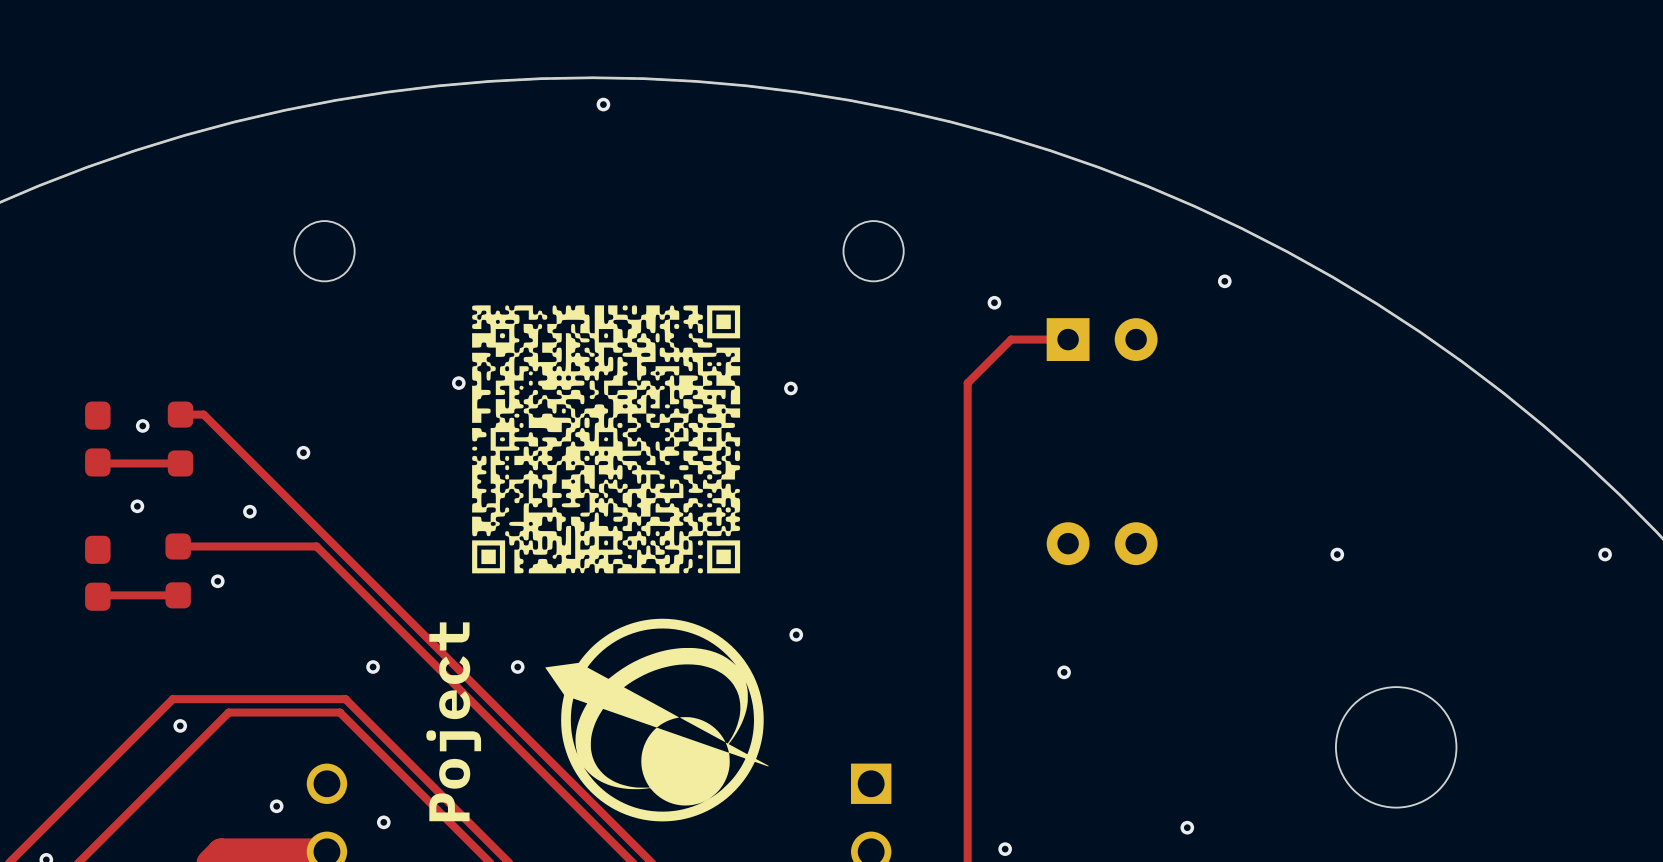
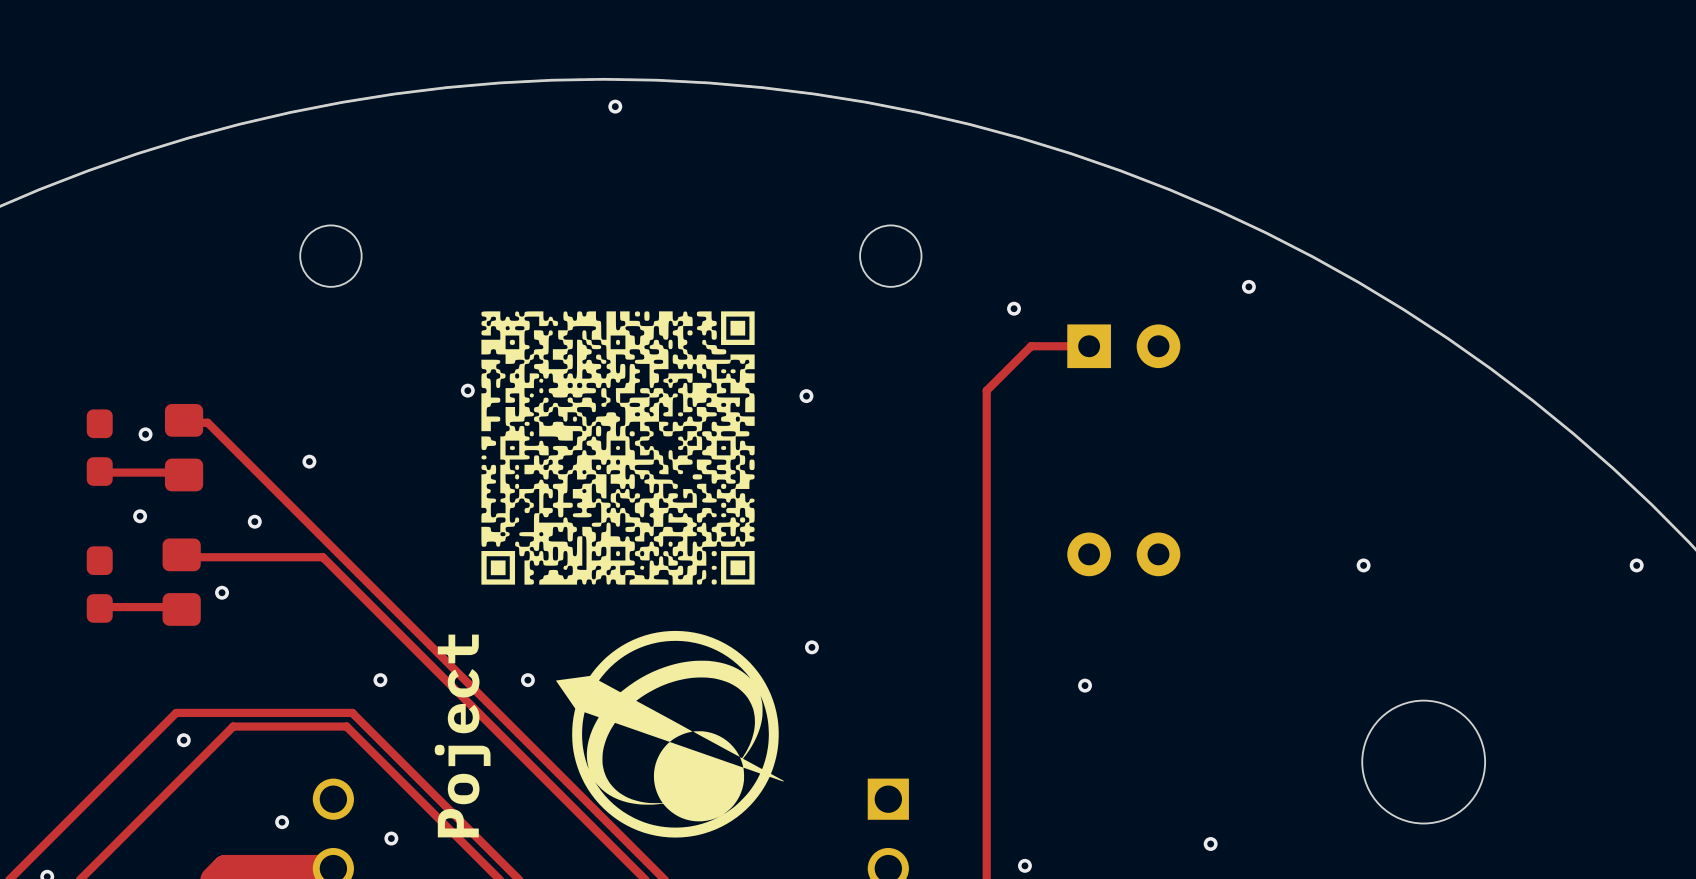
part footprint: [167, 401, 194, 477] -> [164, 403, 204, 492]
part footprint: [165, 533, 191, 609] -> [162, 538, 201, 626]

